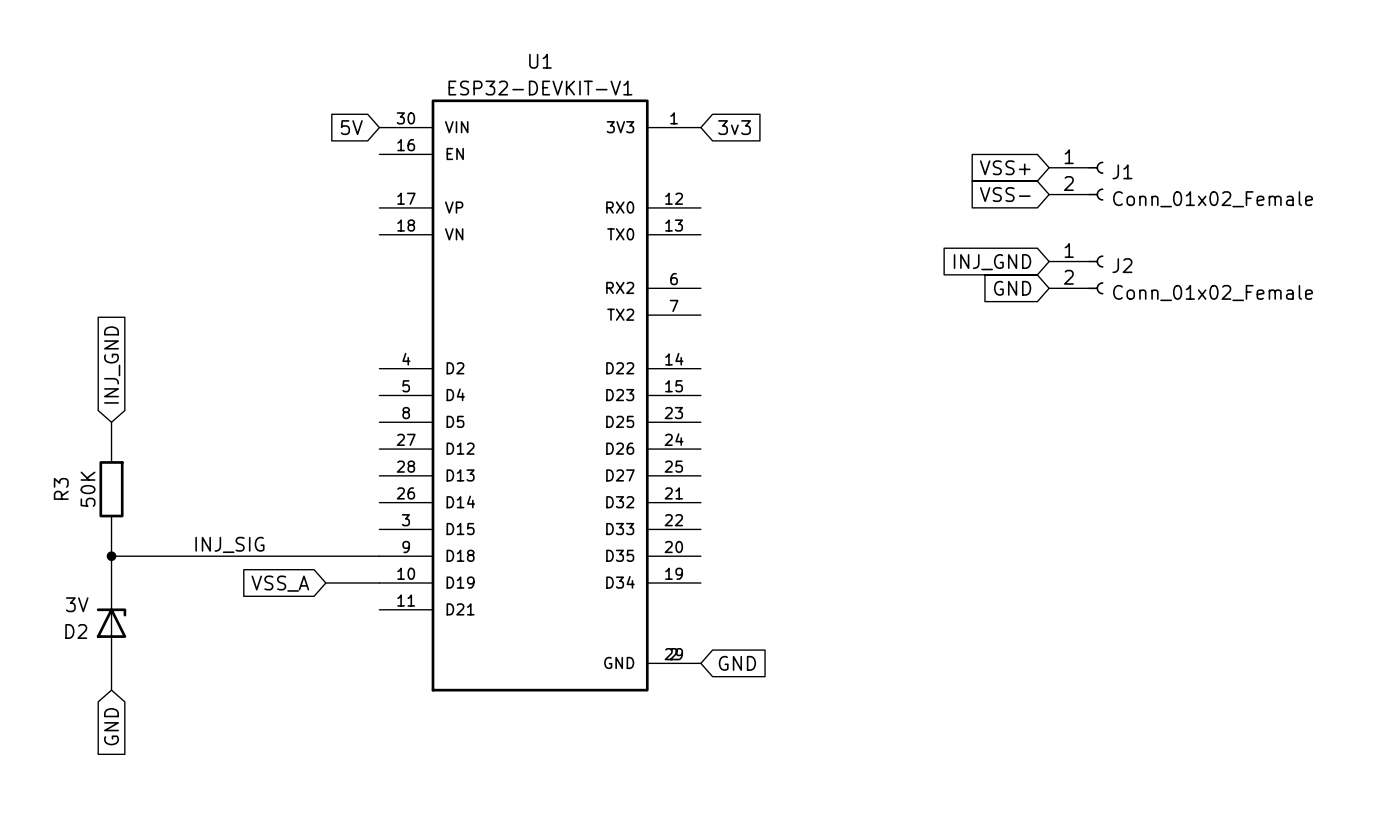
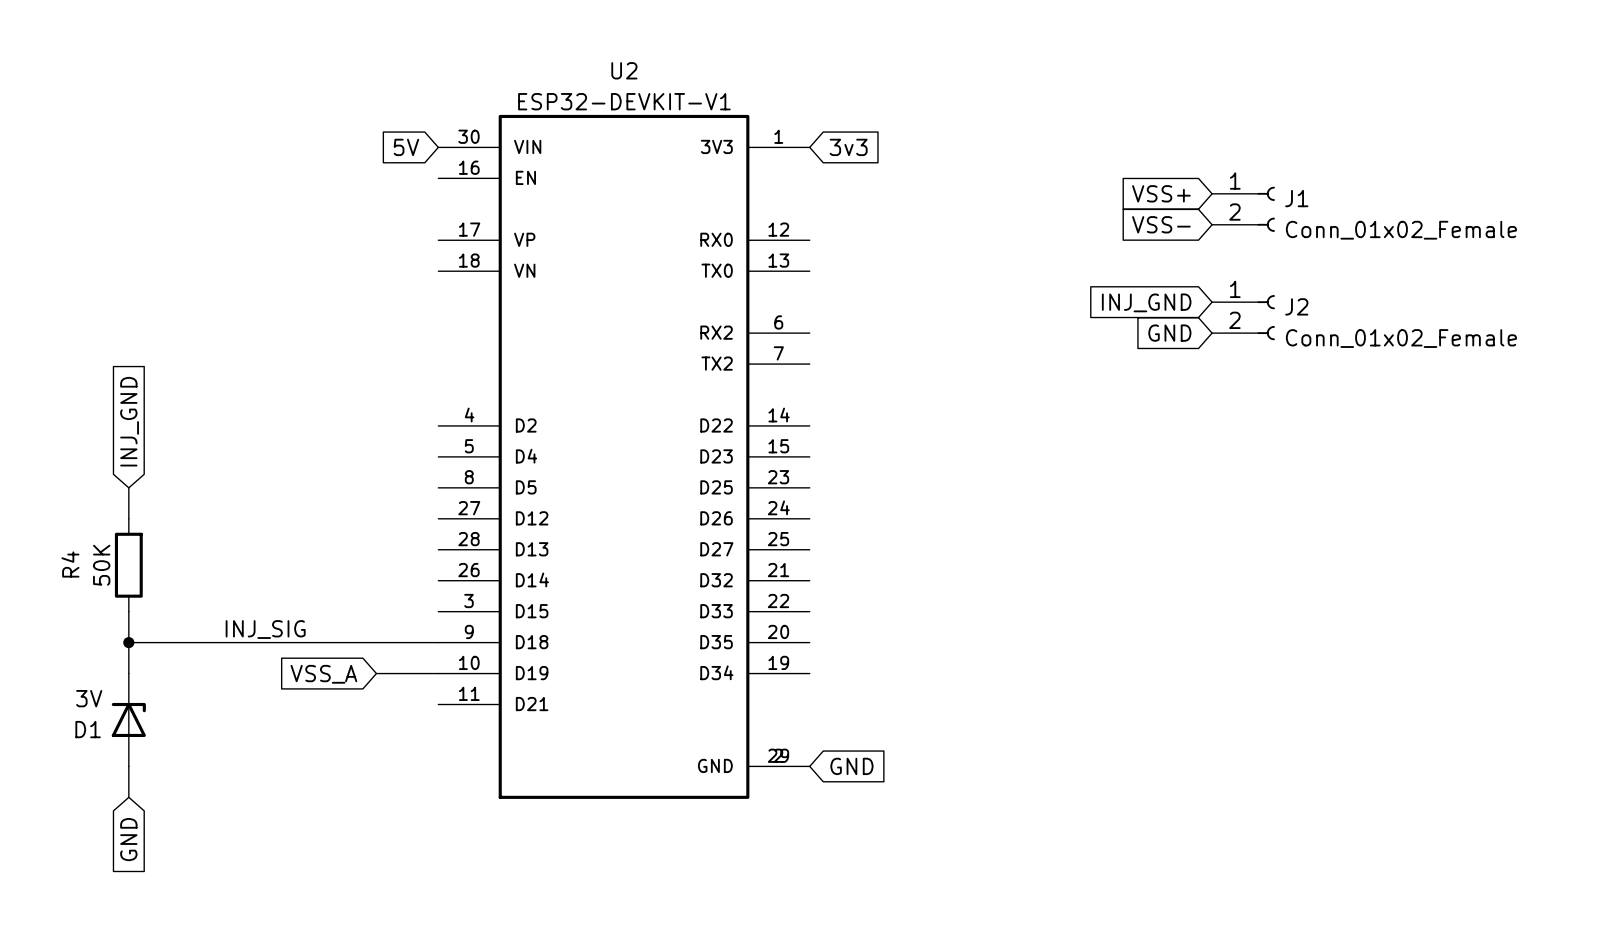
U1 name: U1 (540, 61) -> U2 (624, 70)
R3 name: R3 (61, 488) -> R4 (70, 564)
D2 name: D2 (76, 631) -> D1 (88, 729)

